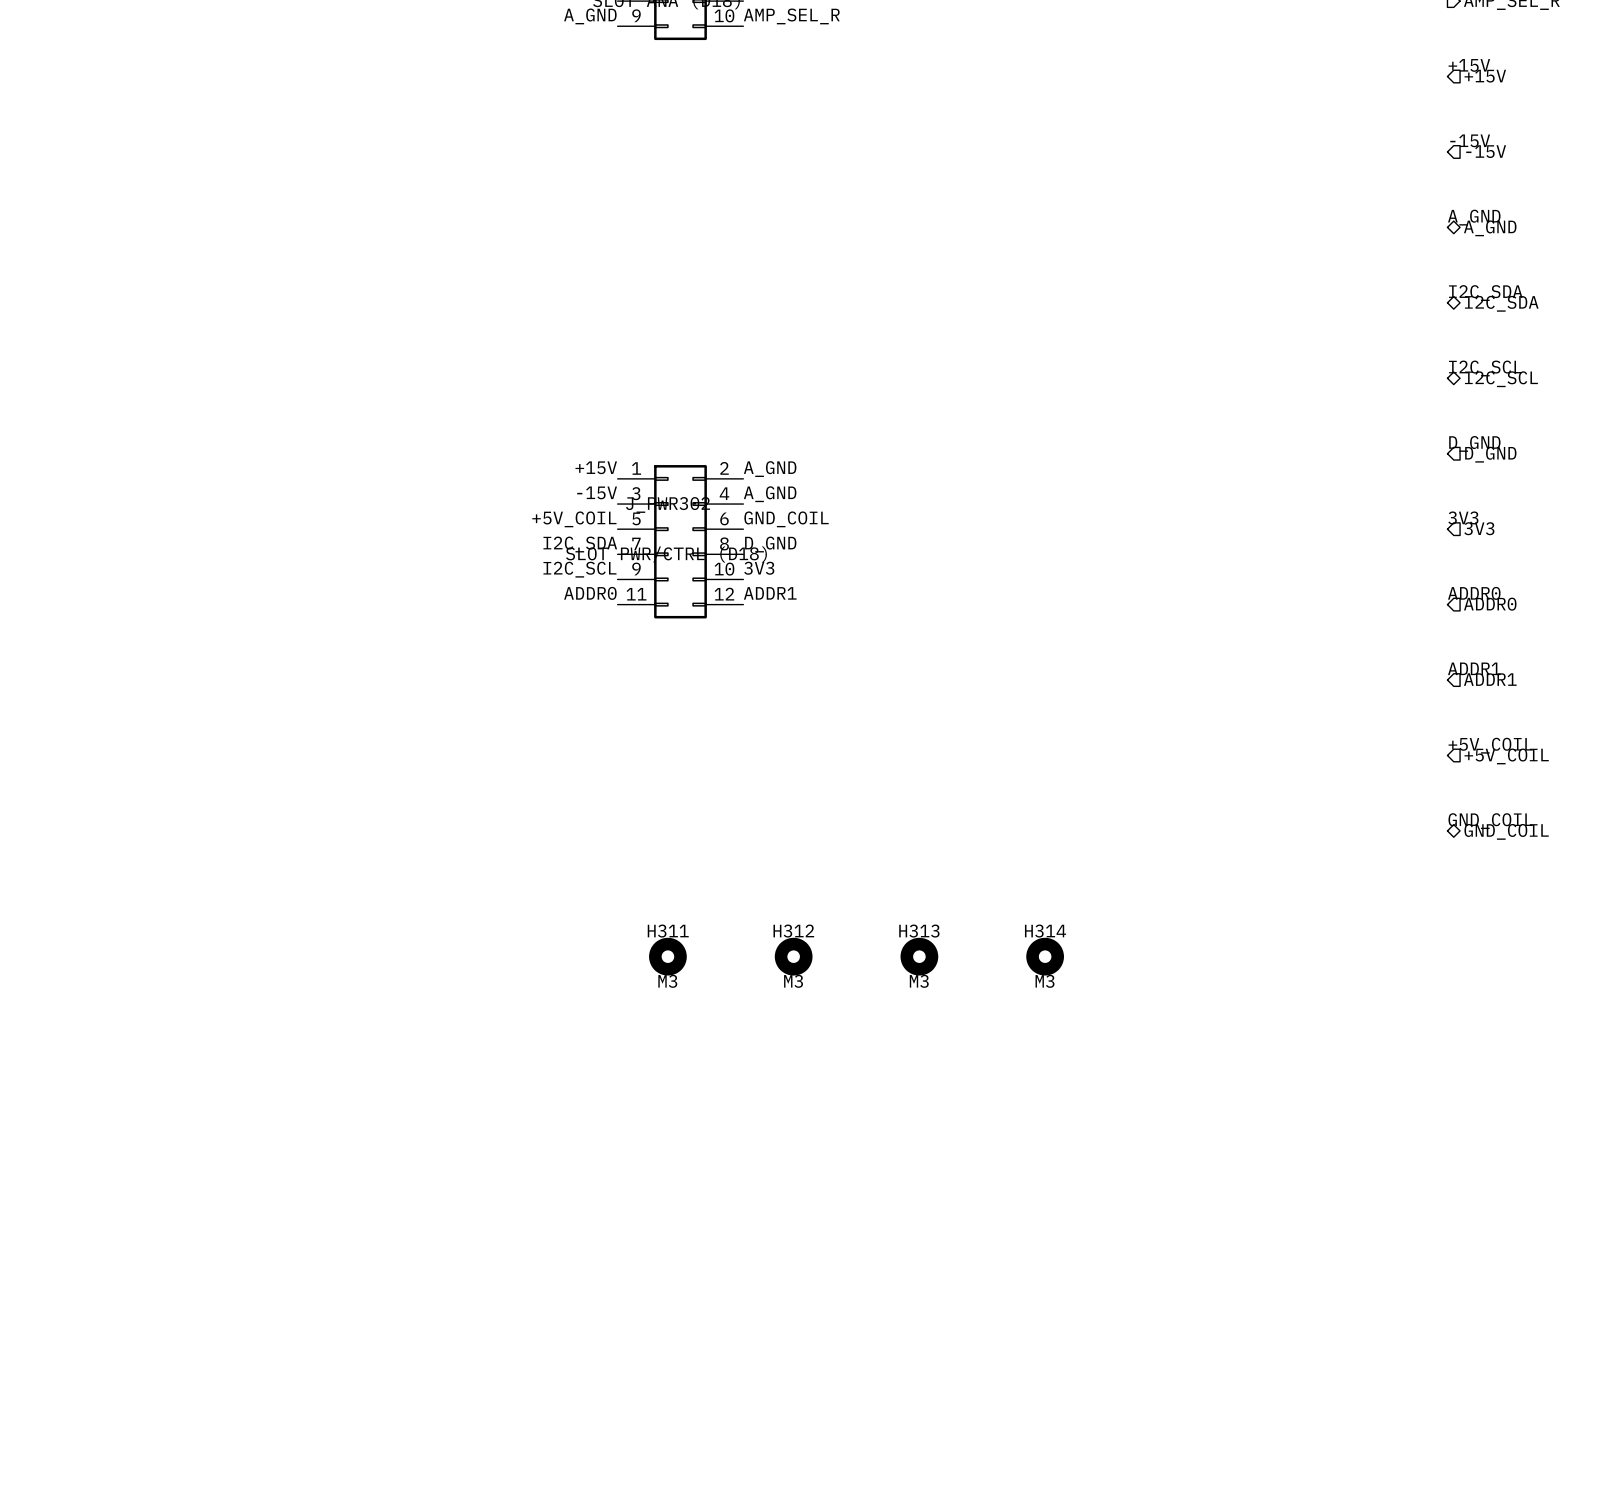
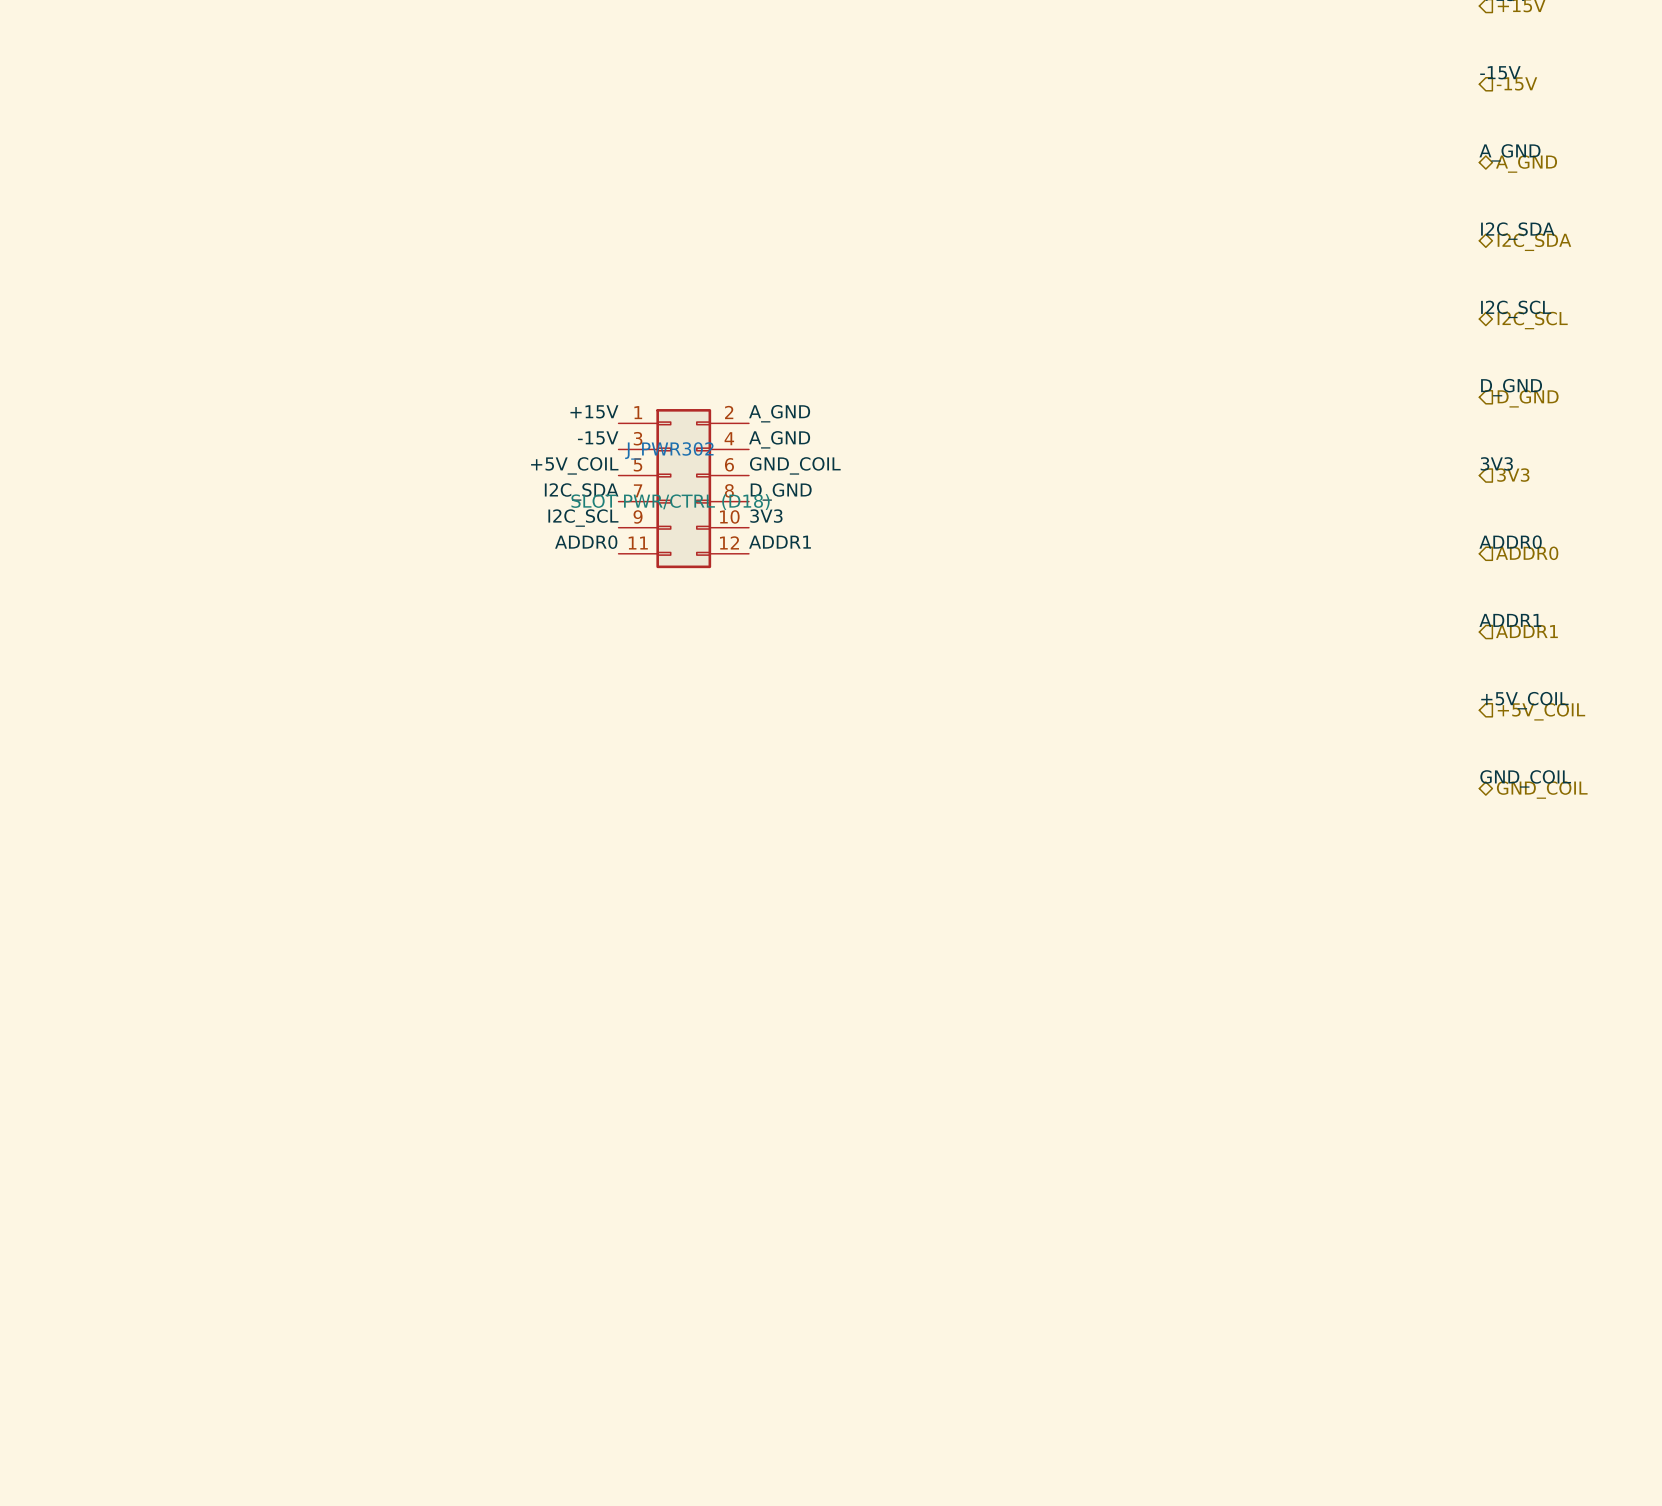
H311: M3 (667, 956) -> none
H312: M3 (793, 956) -> none
H313: M3 (919, 956) -> none
H314: M3 (1045, 956) -> none

